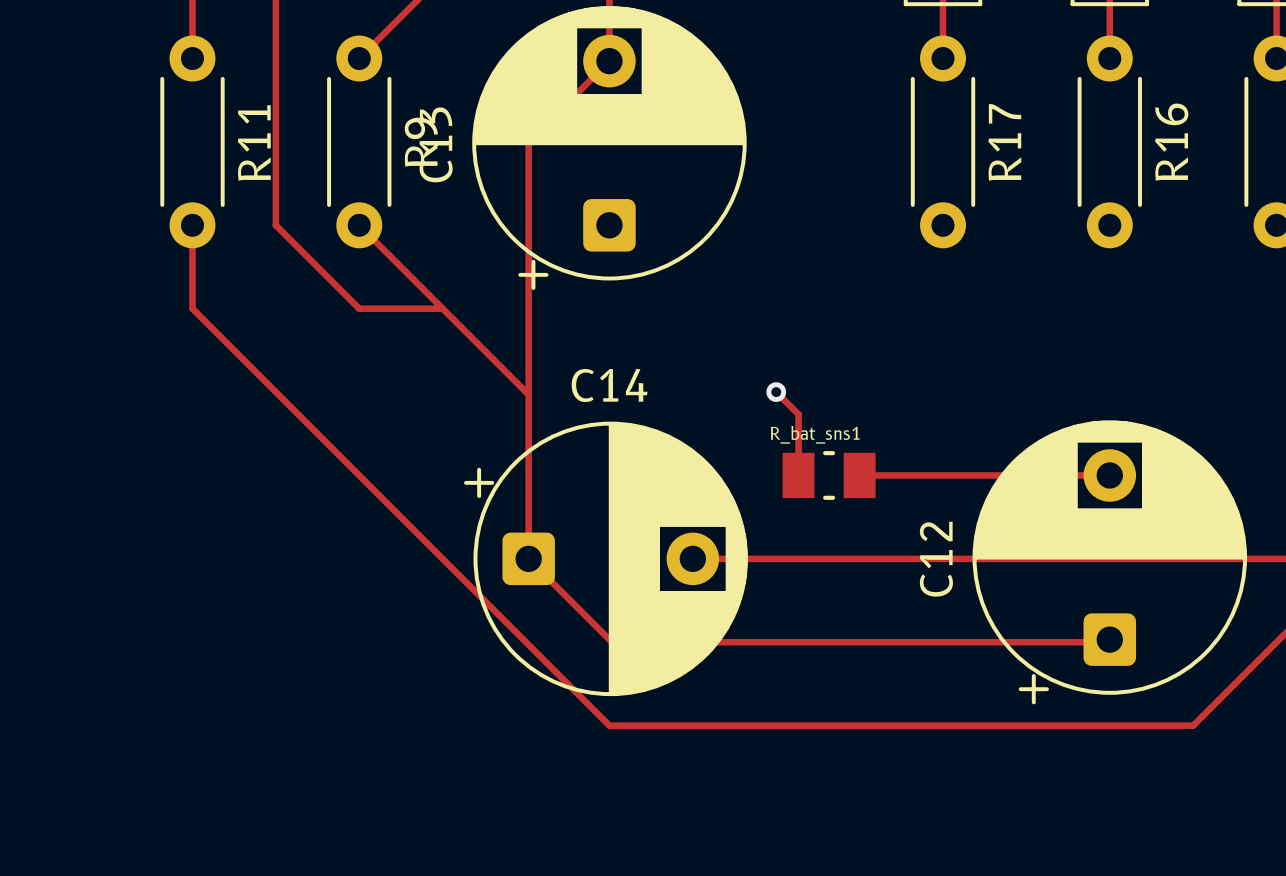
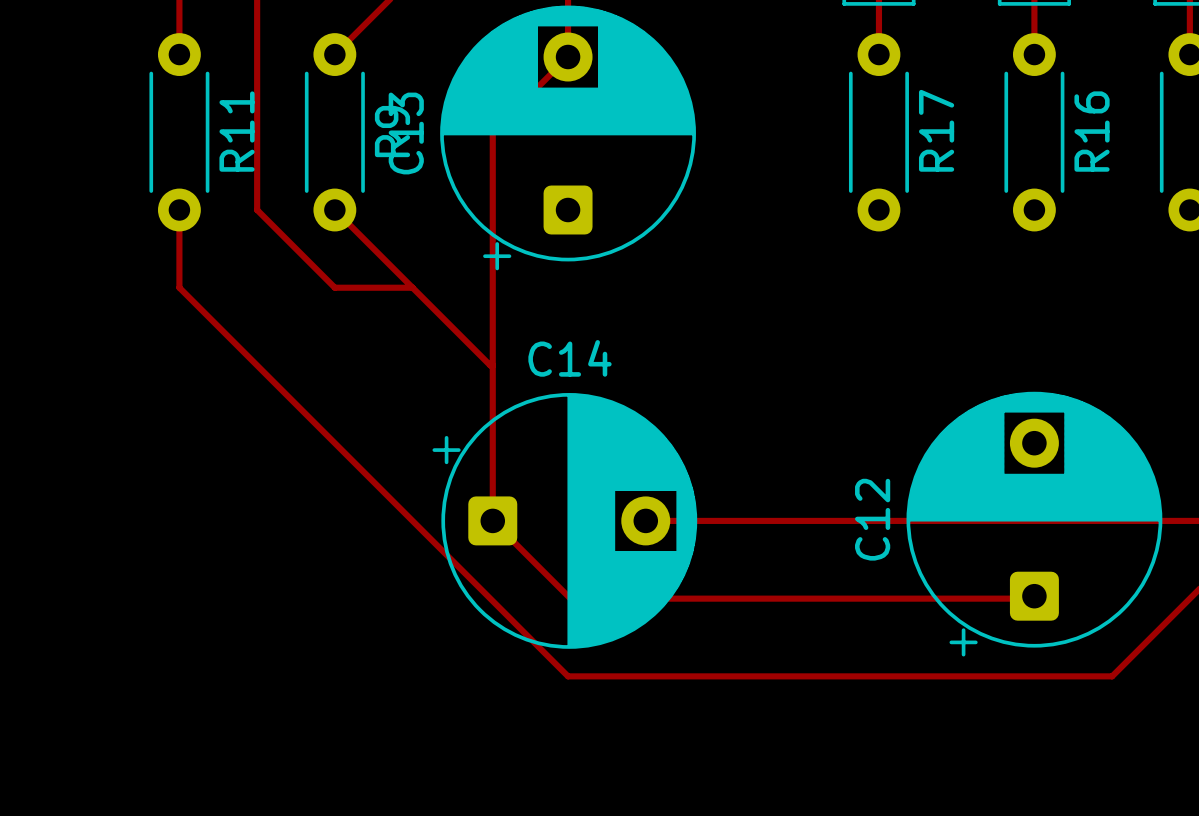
track: (776, 392) (798, 414) (798, 475) -> none
via: (776, 392) -> none
R_bat_sns1: (829, 475) -> none
track: (859, 475) (1109, 475) -> none

